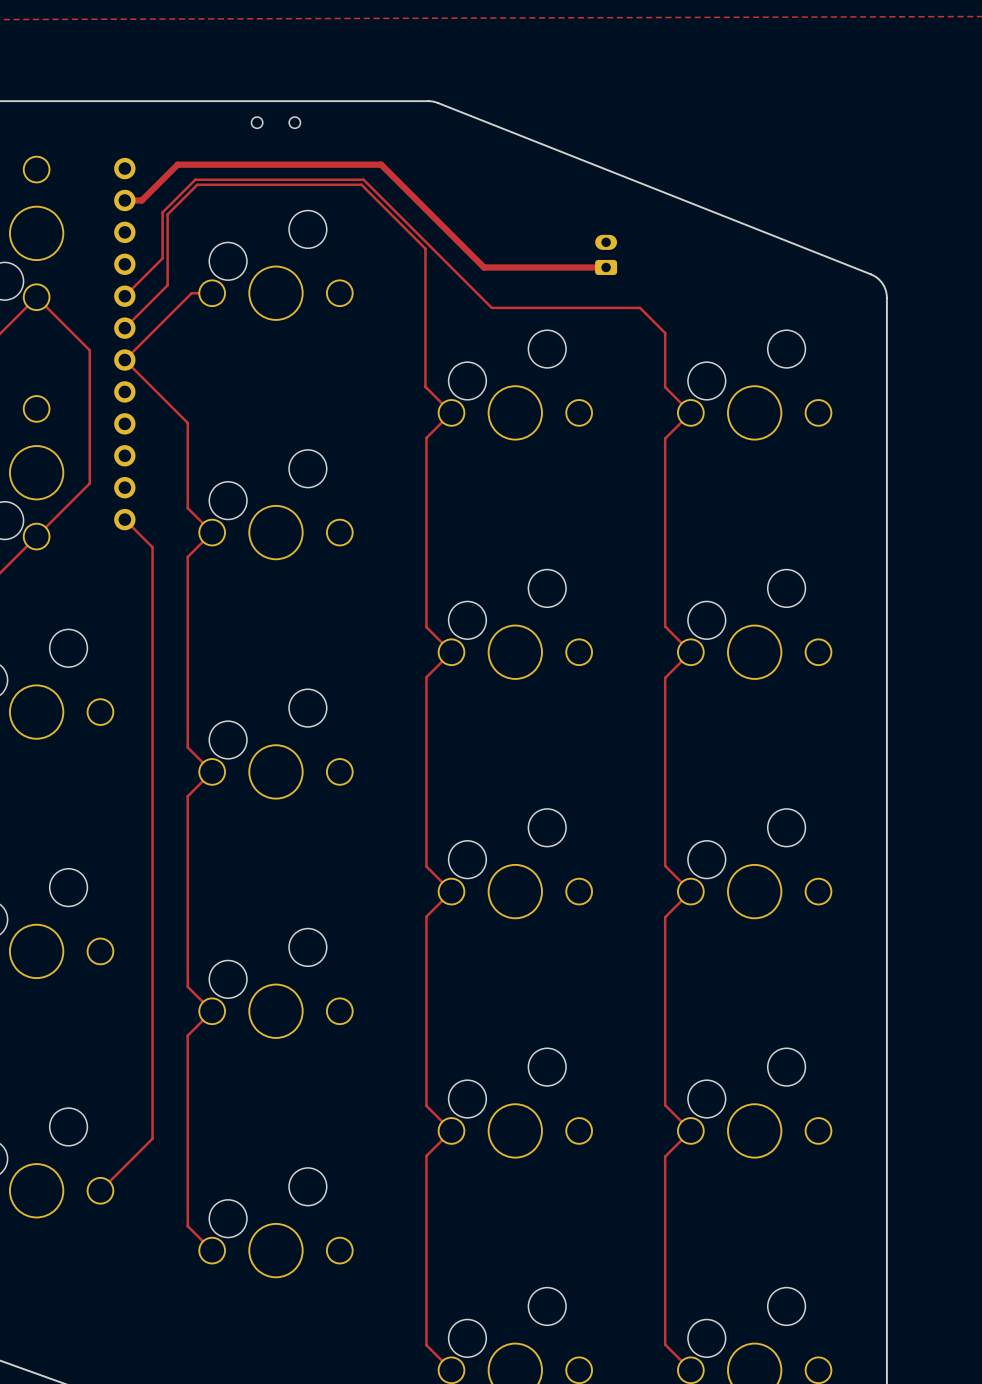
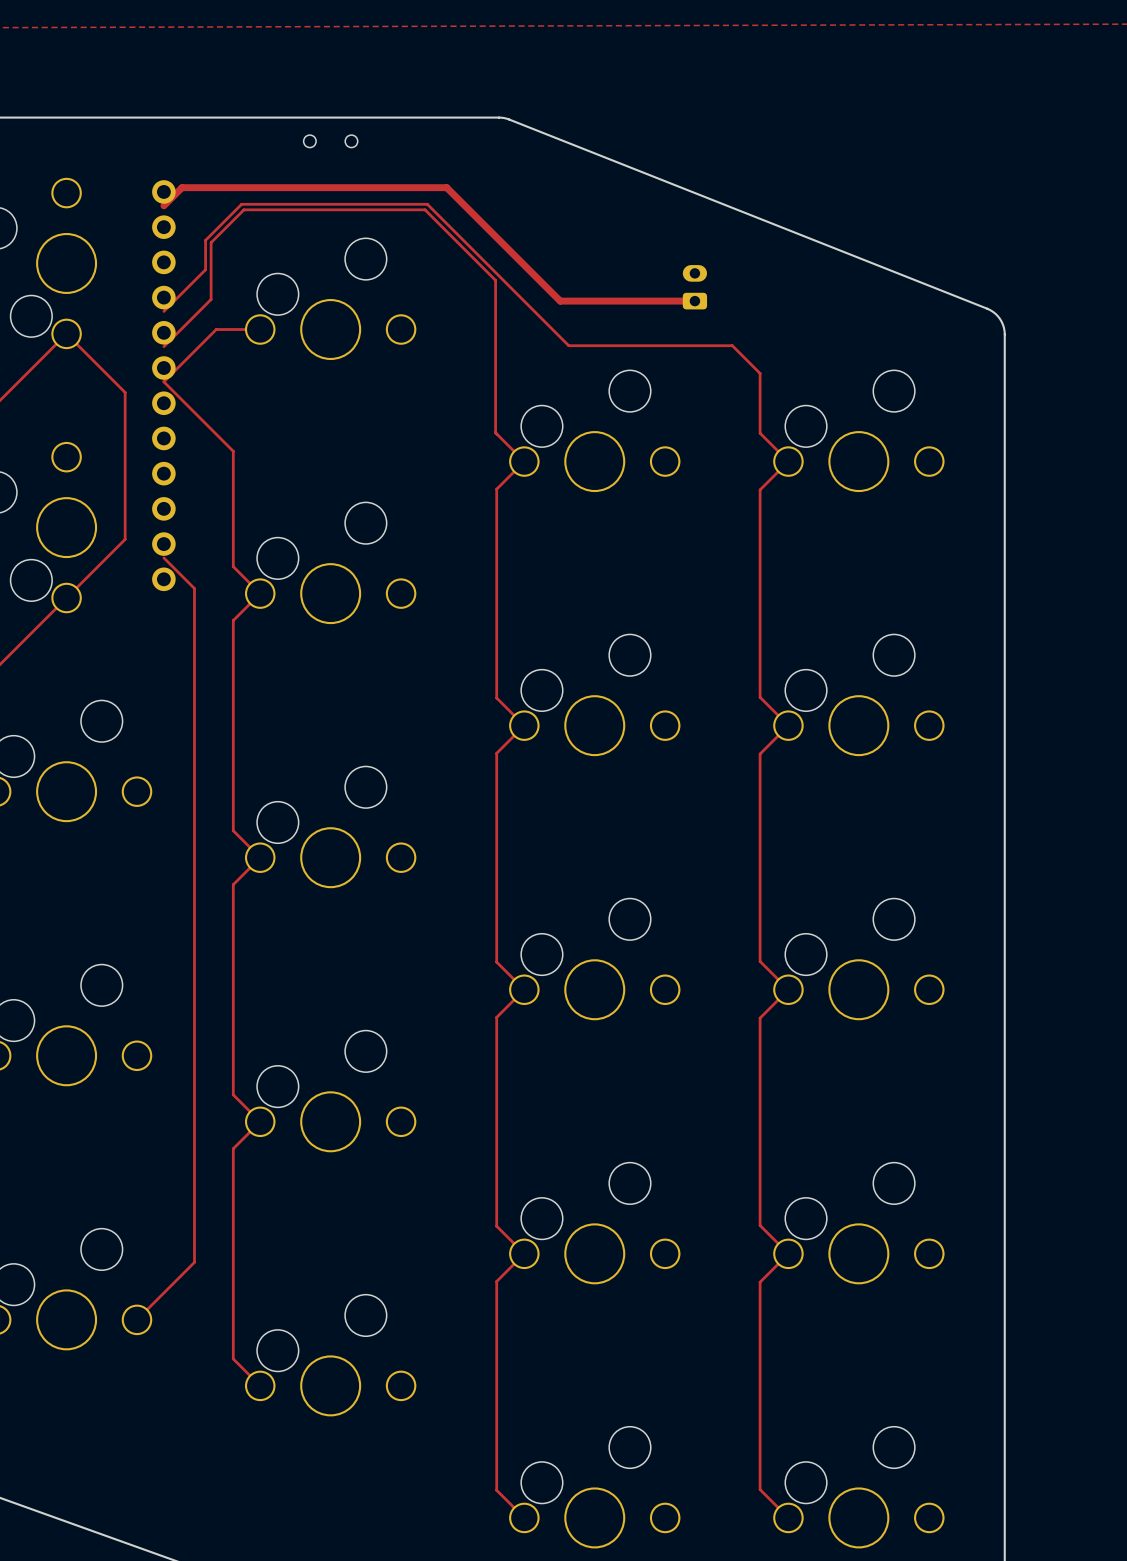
track: (177, 164) (141, 200) (124, 200) -> (222, 187) (182, 187) (163, 205)
track: (162, 239) (162, 258) (124, 296) -> (205, 269) (163, 311)
track: (167, 265) (167, 285) (124, 328) -> (211, 299) (163, 346)
track: (191, 293) (124, 360) (187, 422) -> (237, 329) (216, 329) (163, 381) (233, 451) (233, 472)
track: (124, 519) (152, 547) -> (163, 557) (194, 588) (194, 609)

